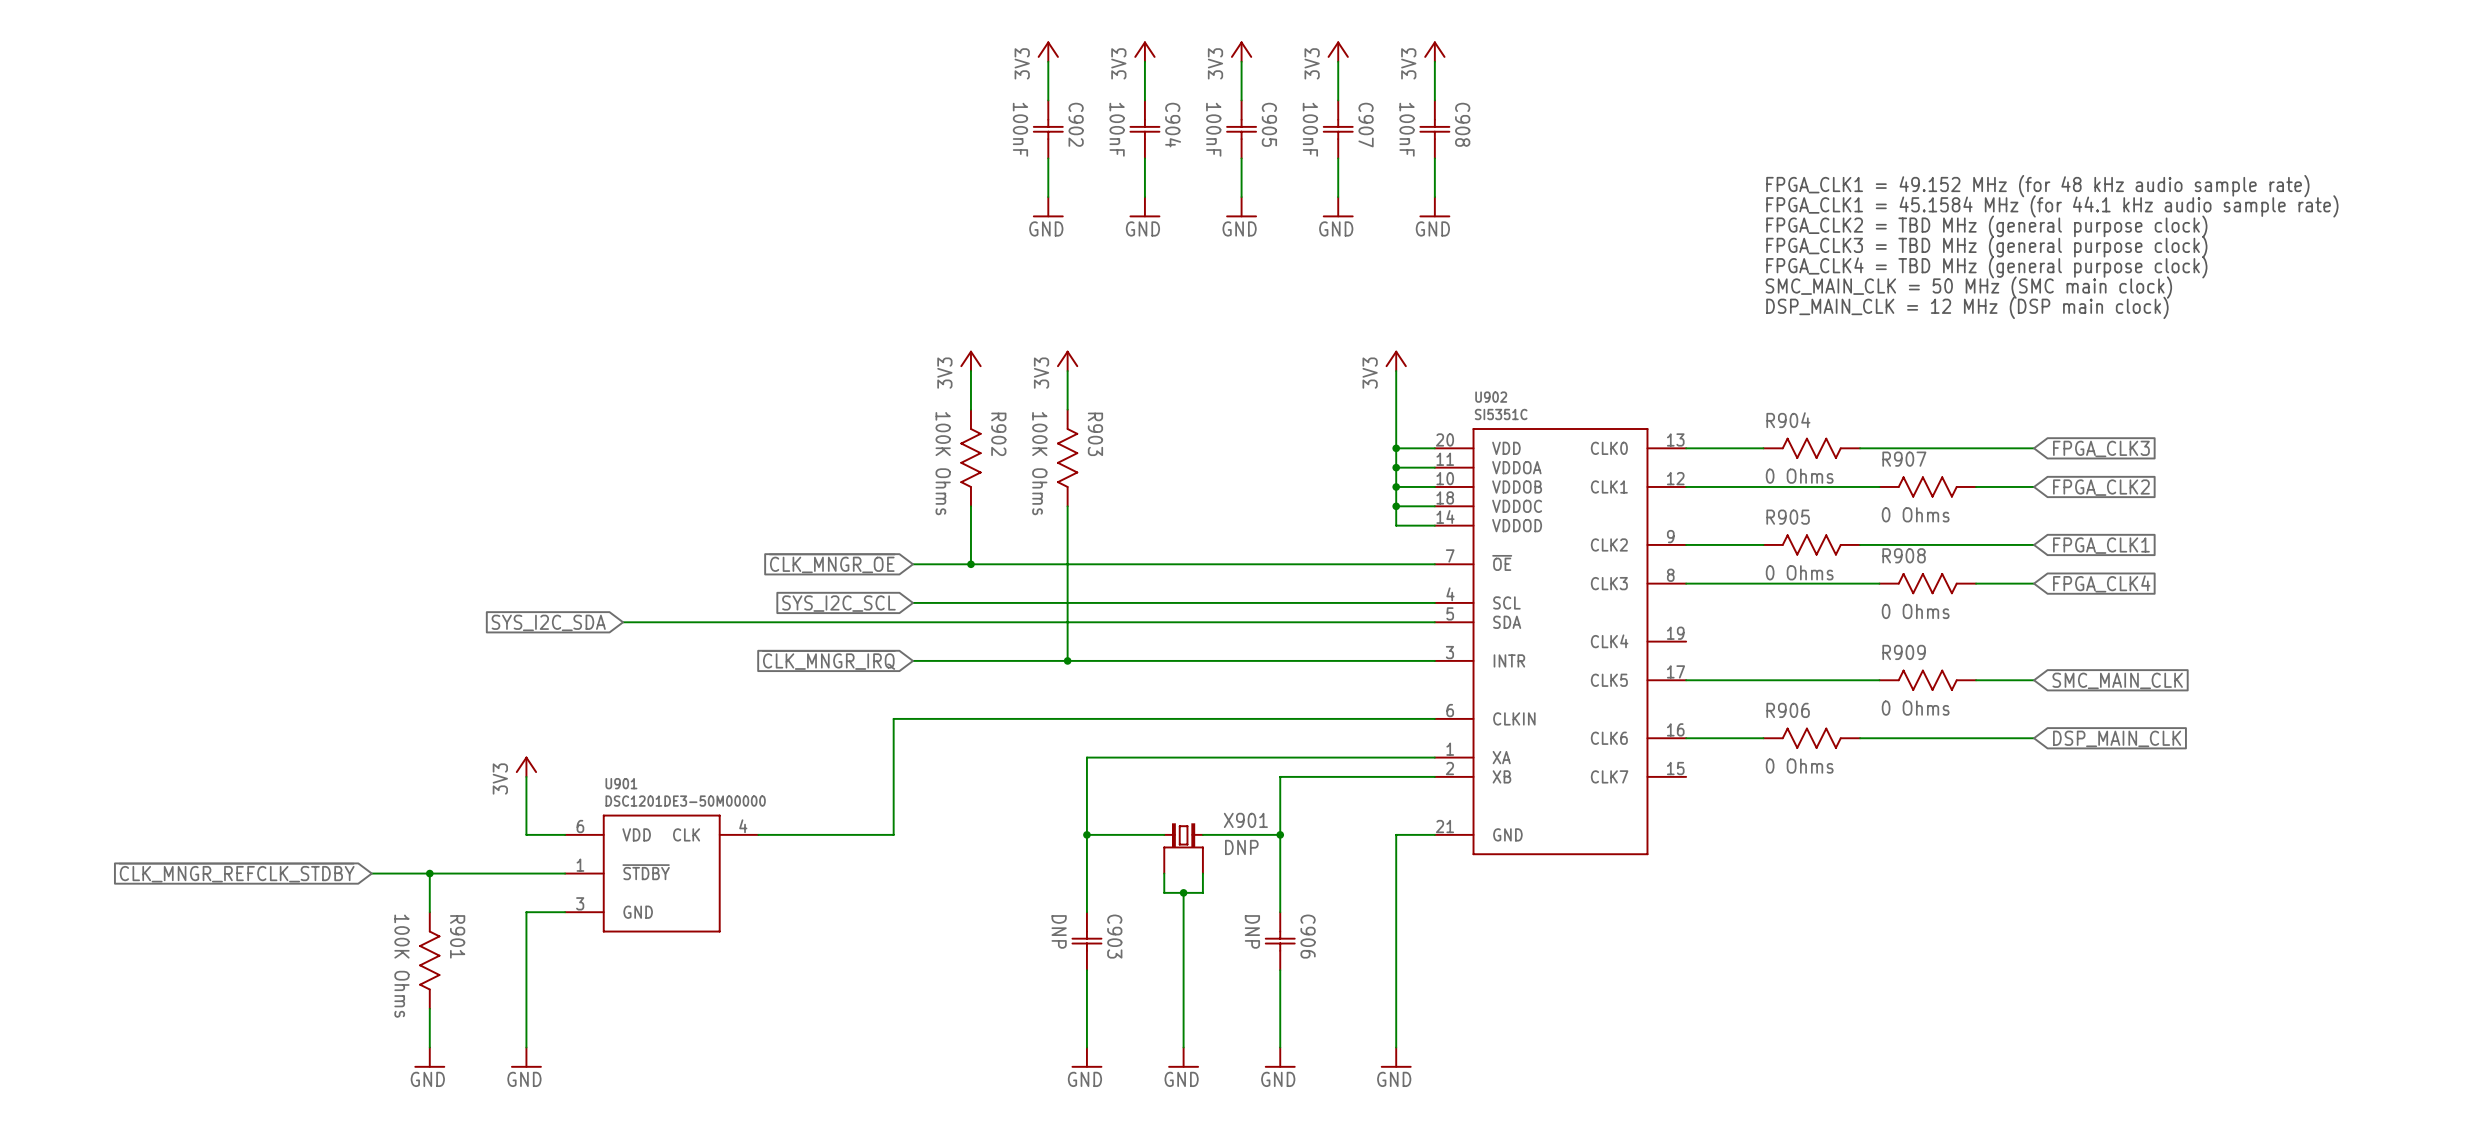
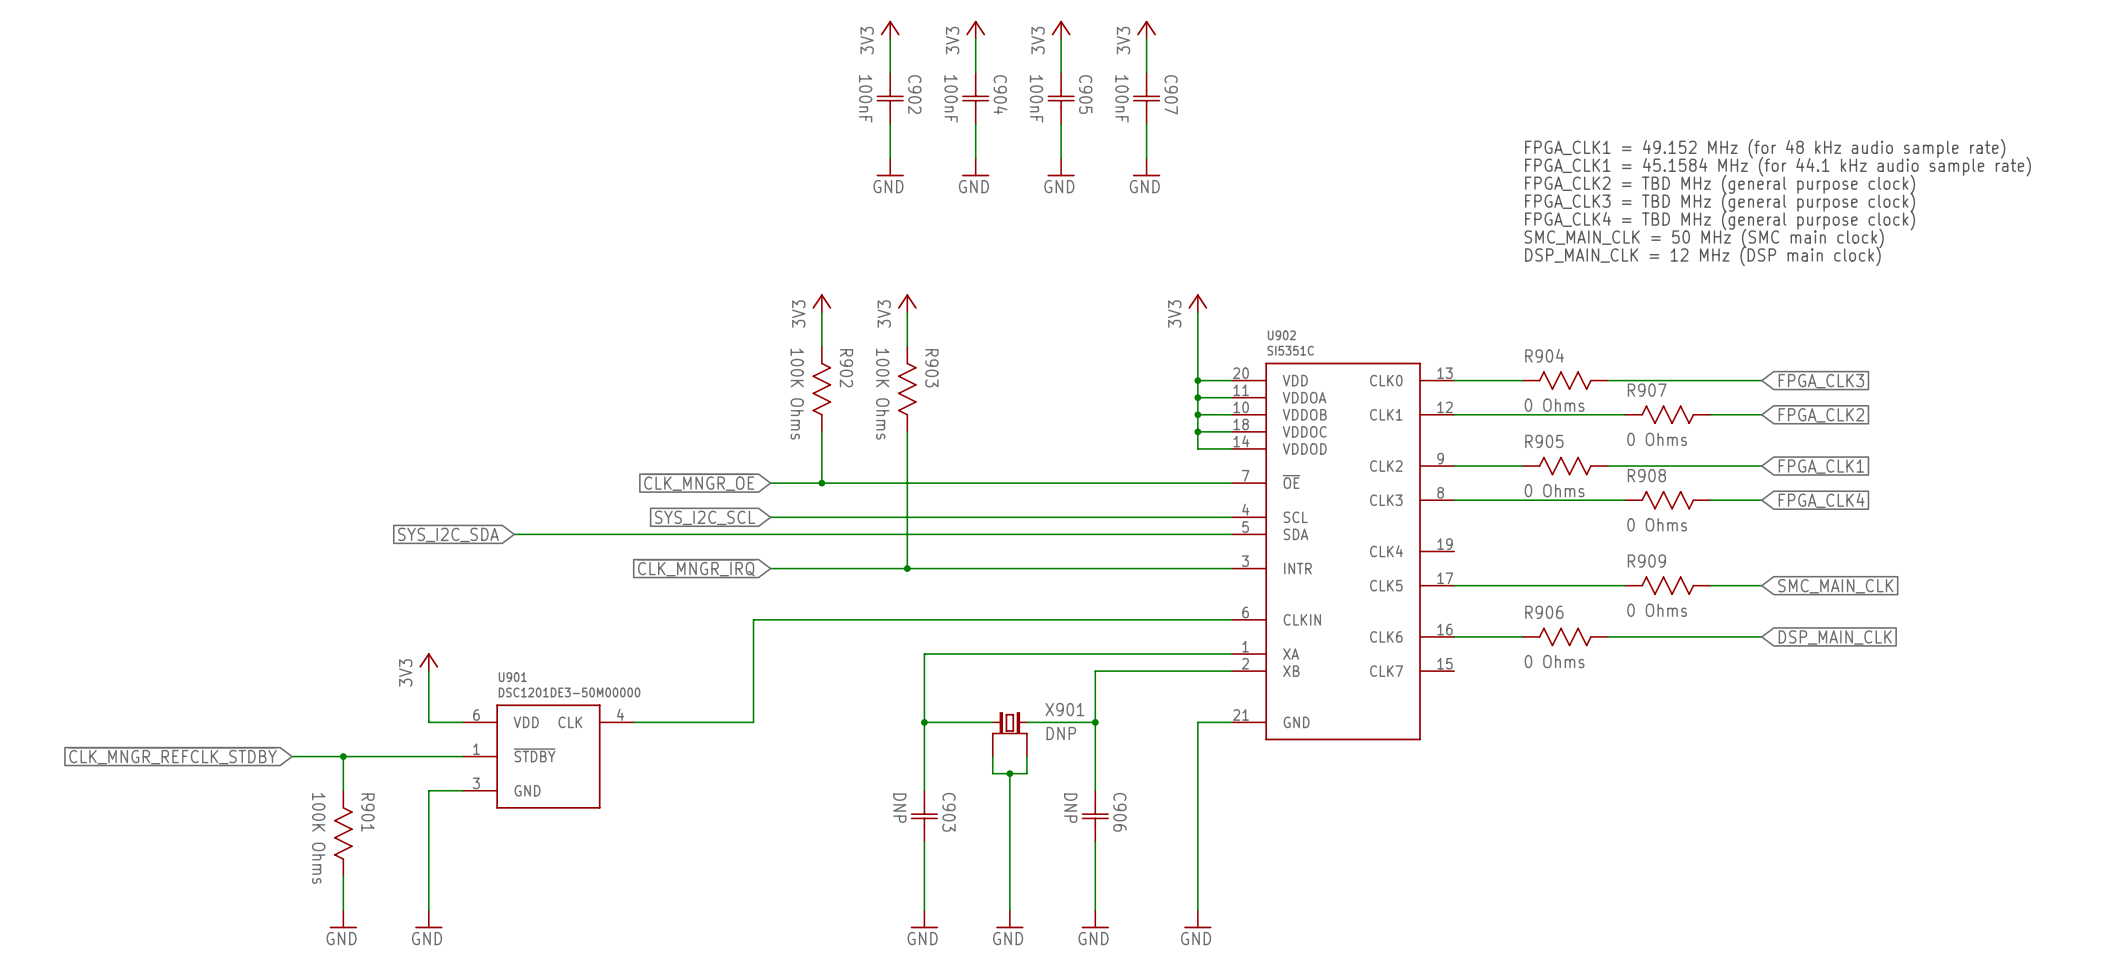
power symbol: 3V3 (1434, 51) -> none
wire: (1434, 61) (1434, 100) -> none
C908: 100nF (1434, 129) -> none
wire: (1434, 158) (1434, 197) -> none
power symbol: GND (1434, 207) -> none

